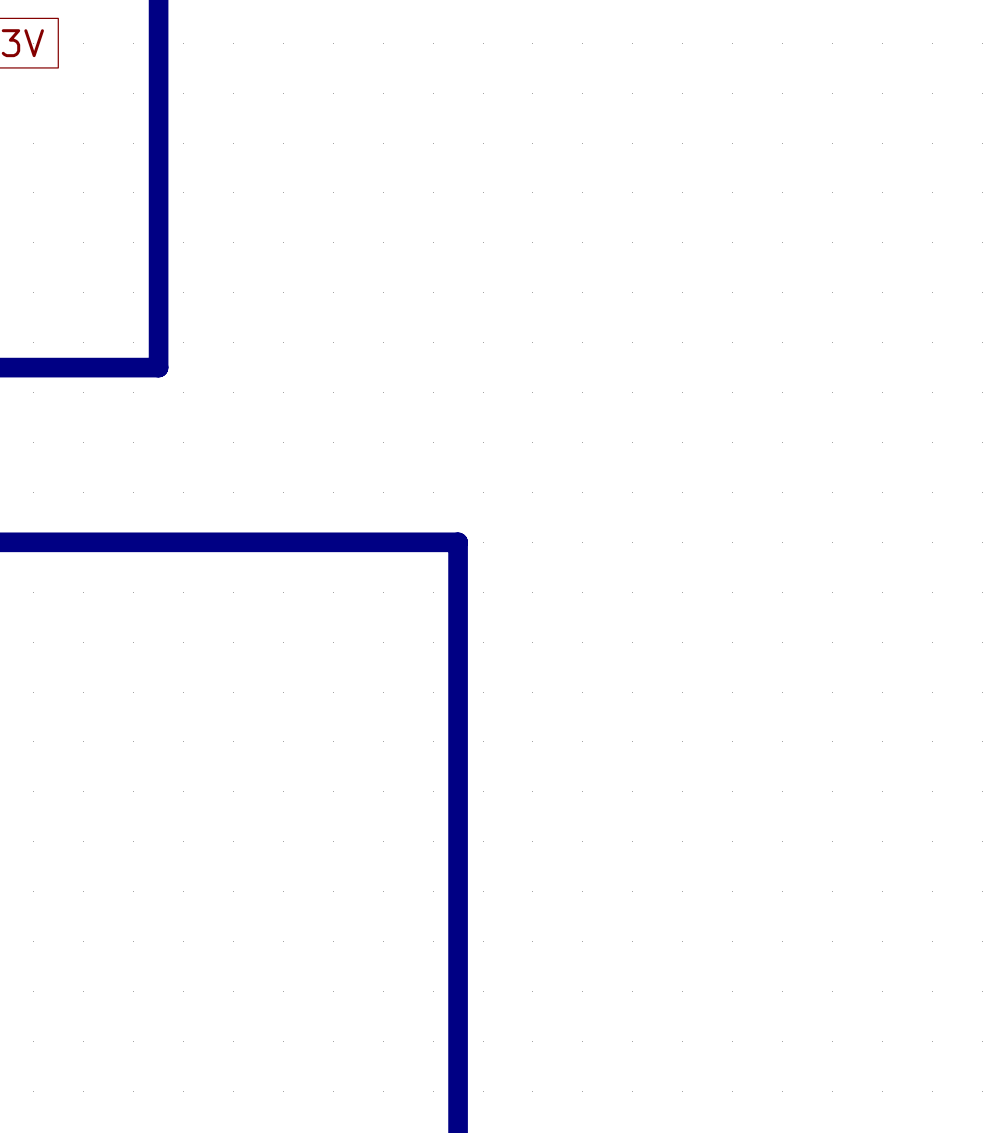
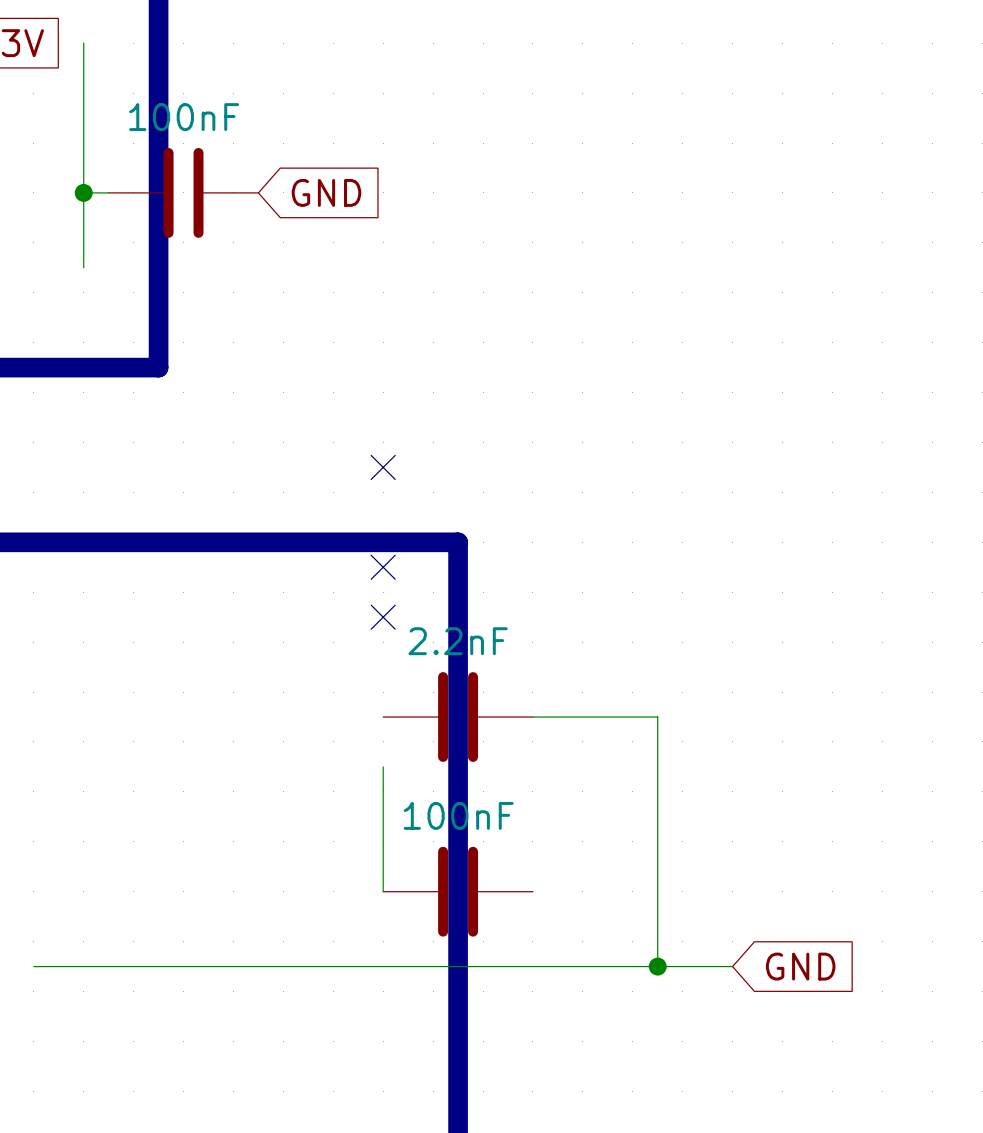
wire: none -> (83, 43) (83, 267)
wire: none -> (83, 192) (108, 192)
junction: none -> (83, 192)
part: none -> 100nF (183, 192)
global label: none -> GND (326, 192)
no-connect mark: none -> (383, 467)
no-connect mark: none -> (383, 567)
no-connect mark: none -> (383, 617)
part: none -> 2.2nF (458, 717)
wire: none -> (532, 717) (657, 717) (657, 966)
wire: none -> (383, 766) (383, 891)
part: none -> 100nF (458, 891)
wire: none -> (33, 966) (732, 966)
junction: none -> (657, 966)
global label: none -> GND (800, 966)

